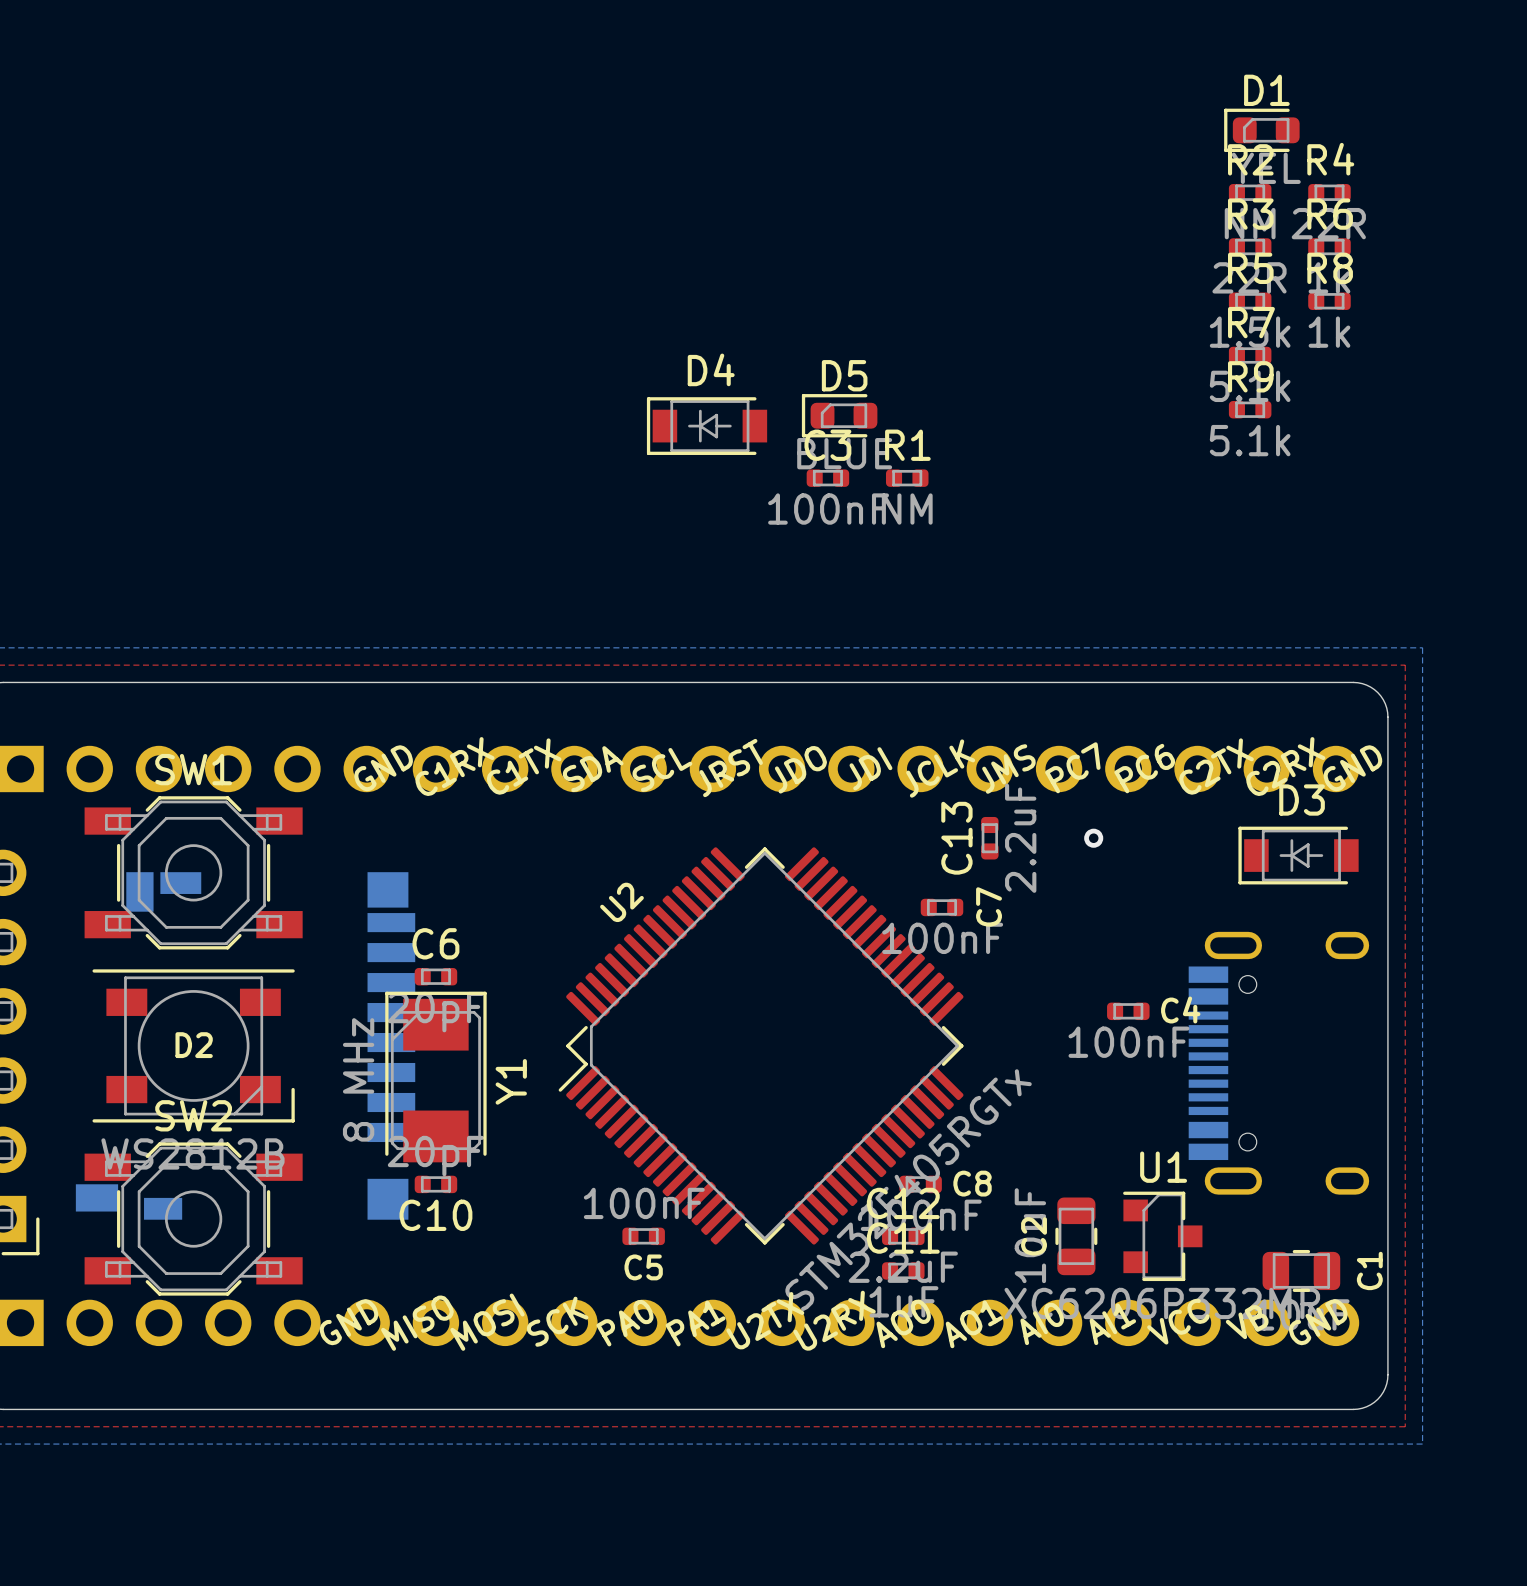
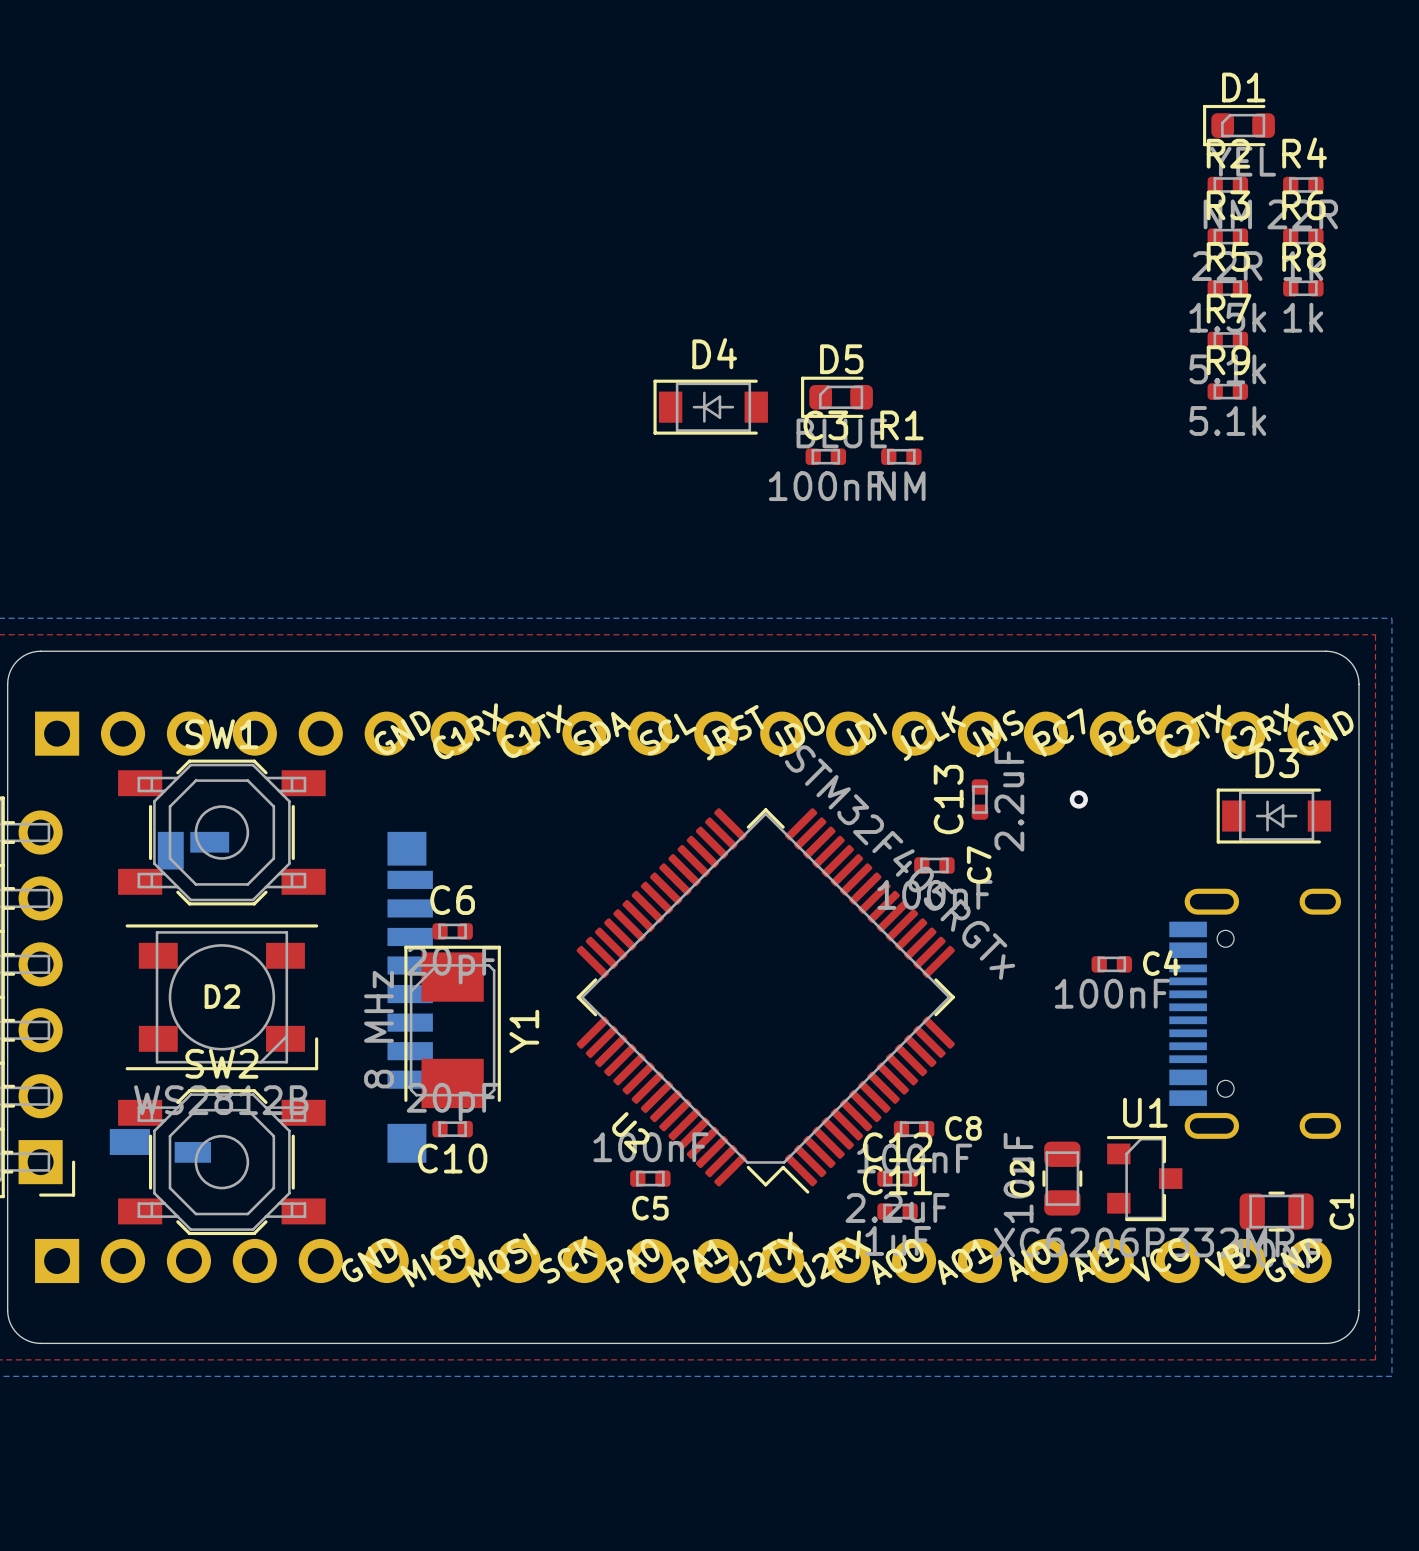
U2 rotation: 0° (761, 1045) -> 90° counterclockwise (765, 1000)

